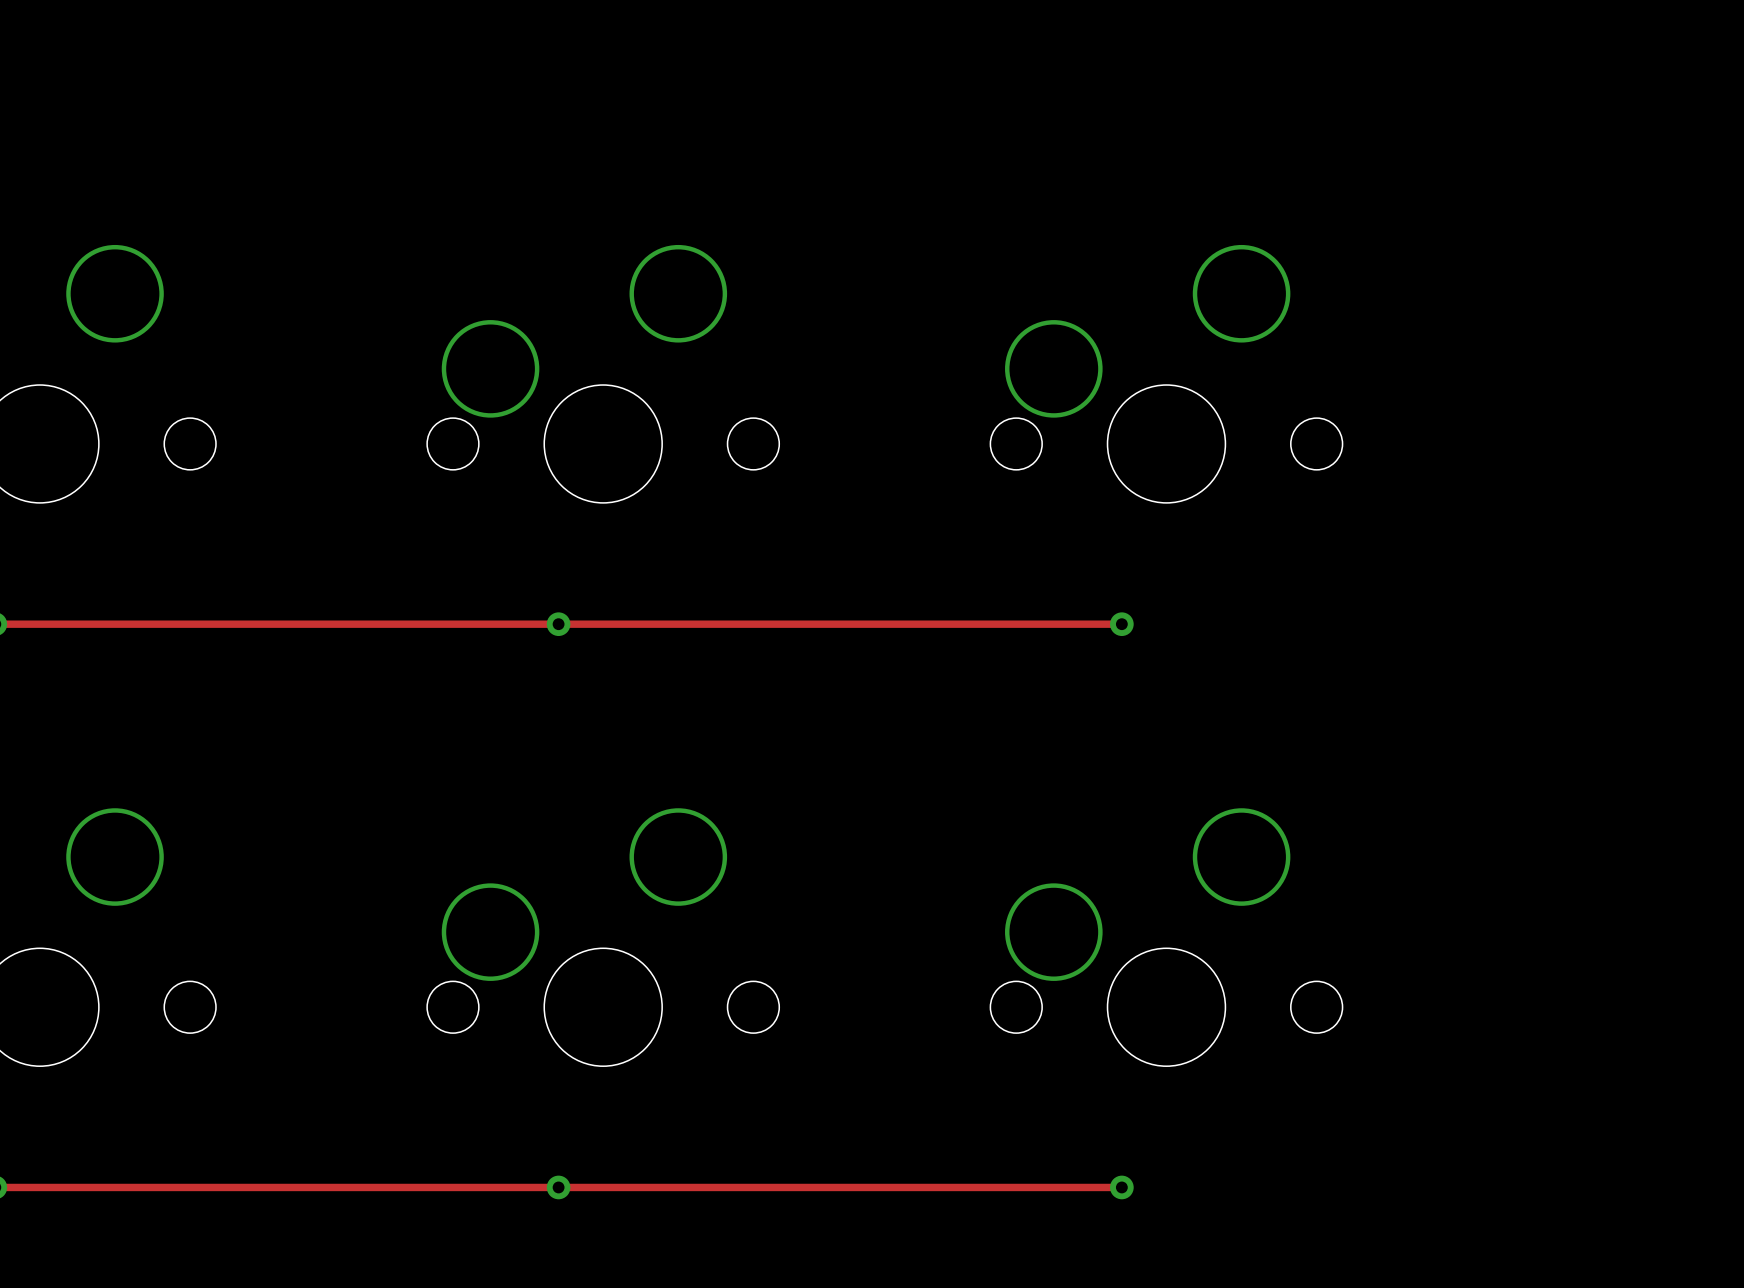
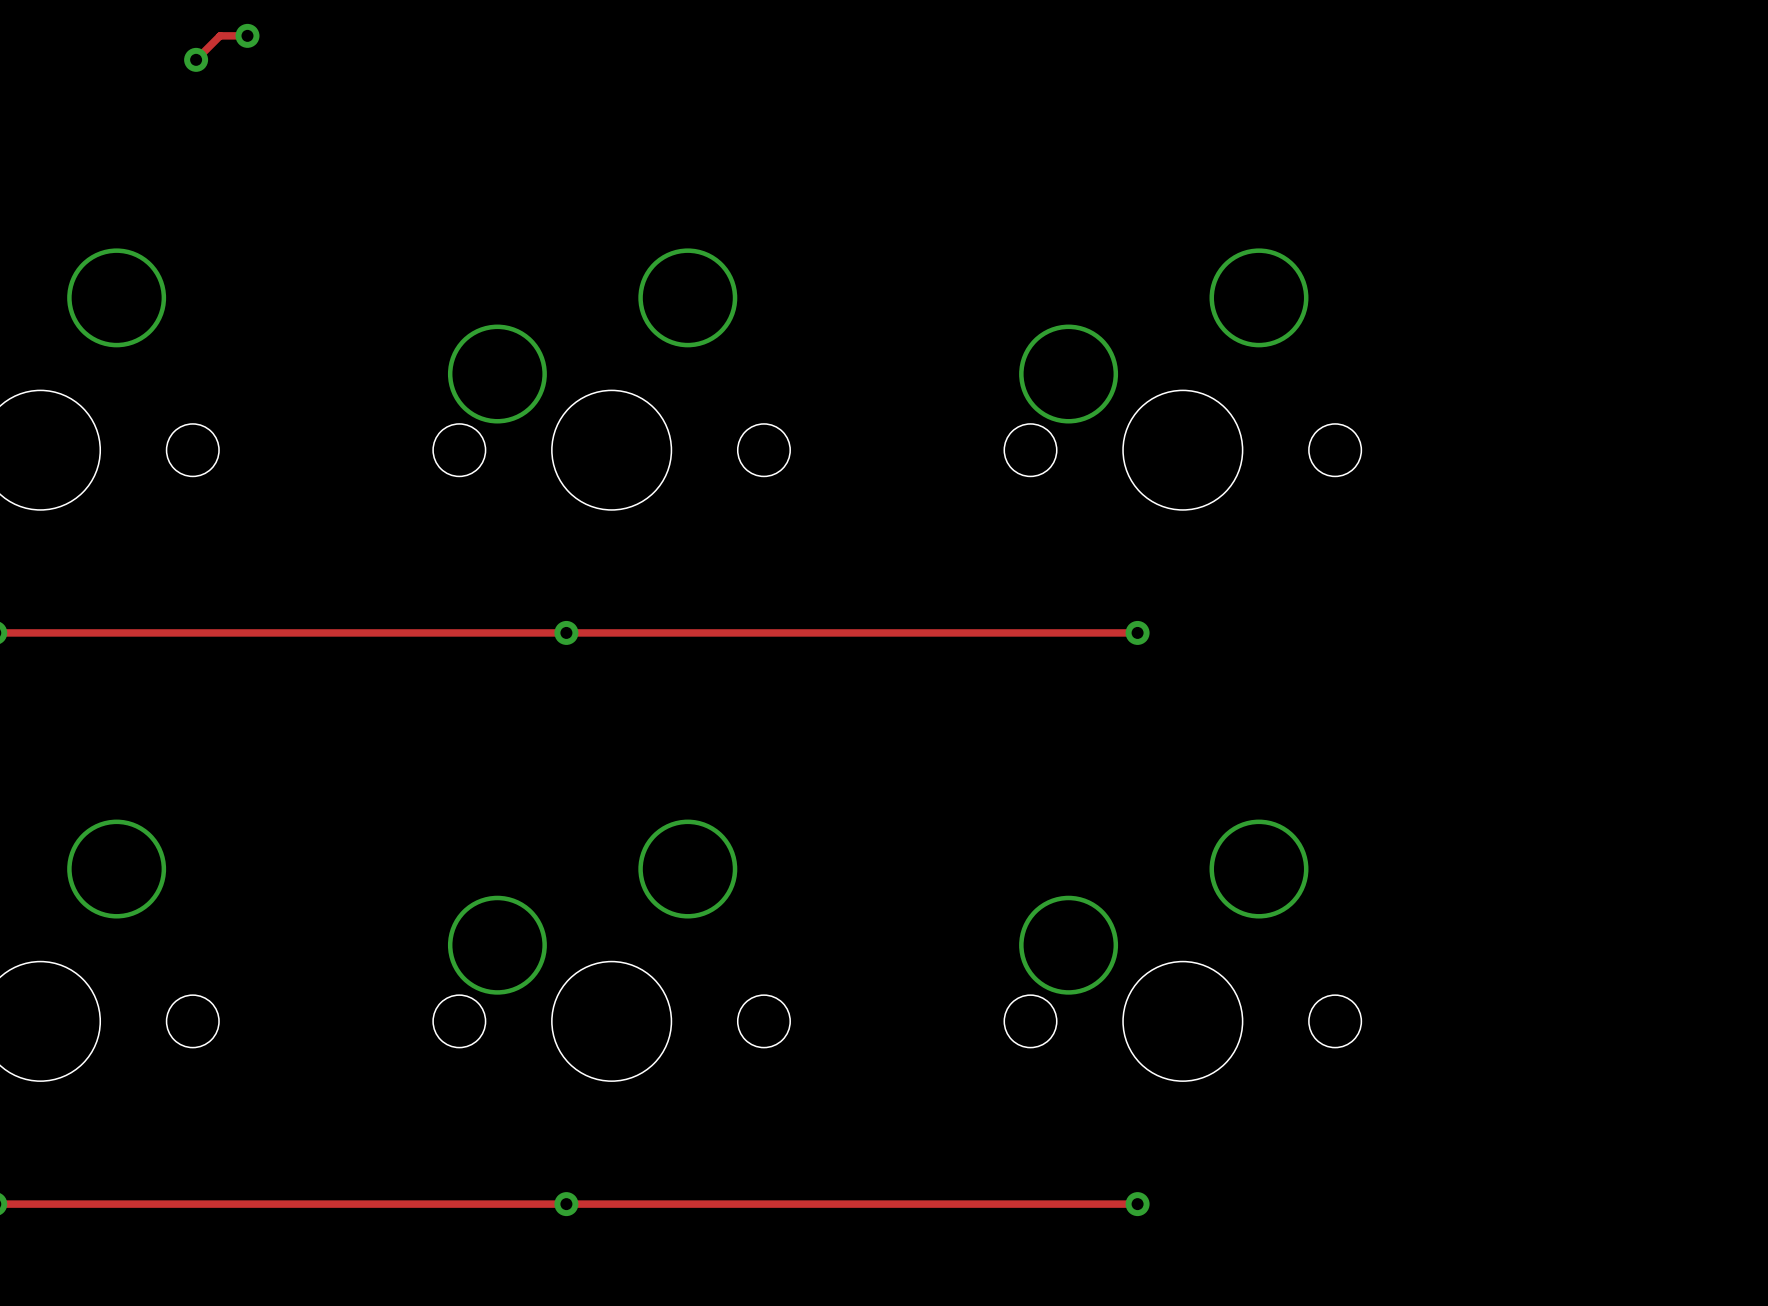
track: none -> (247, 35) (220, 35) (196, 59)
via: none -> (247, 35)
via: none -> (196, 59)

